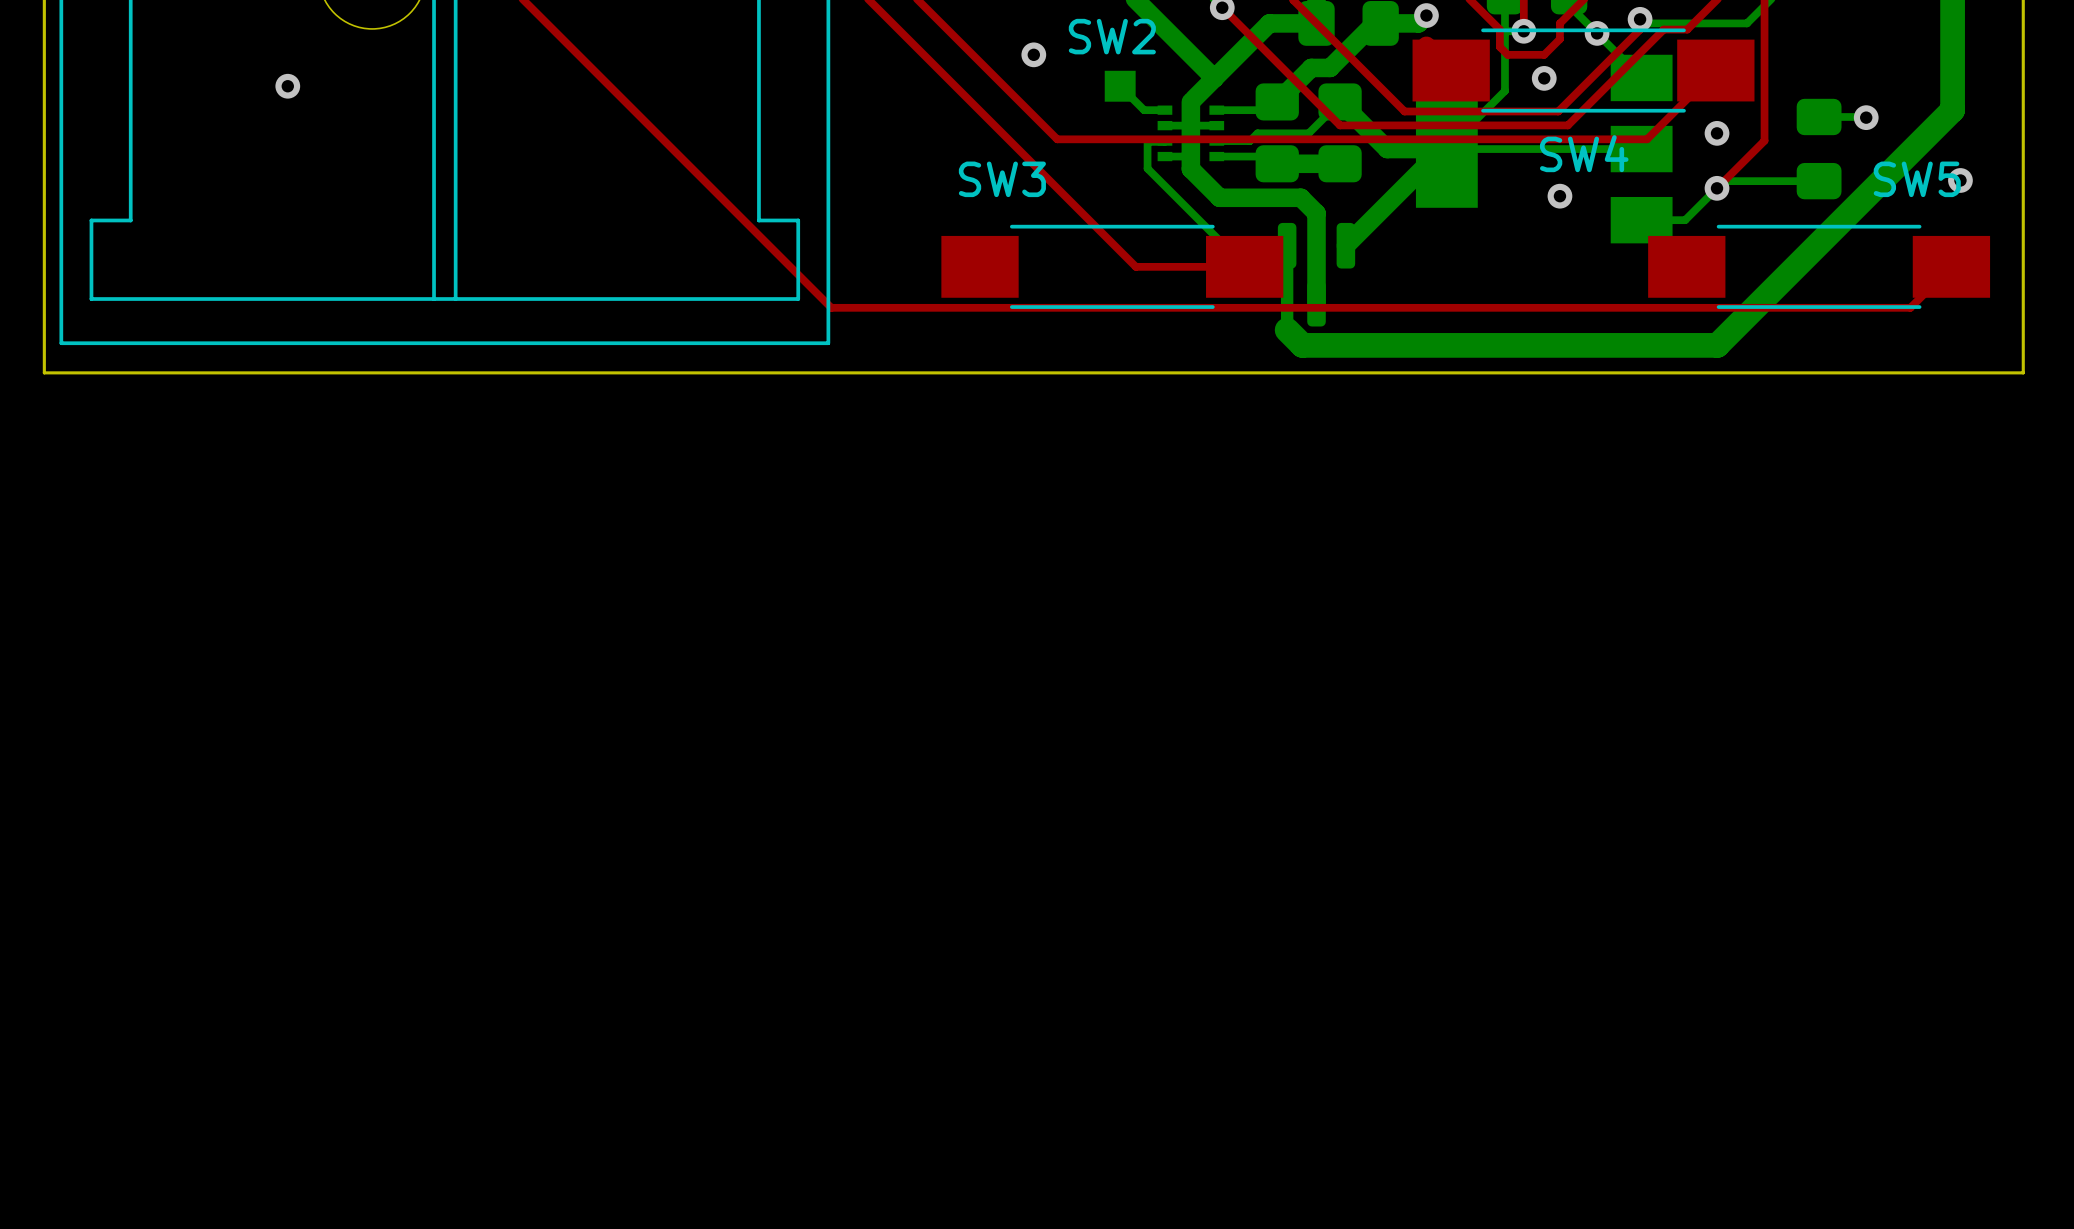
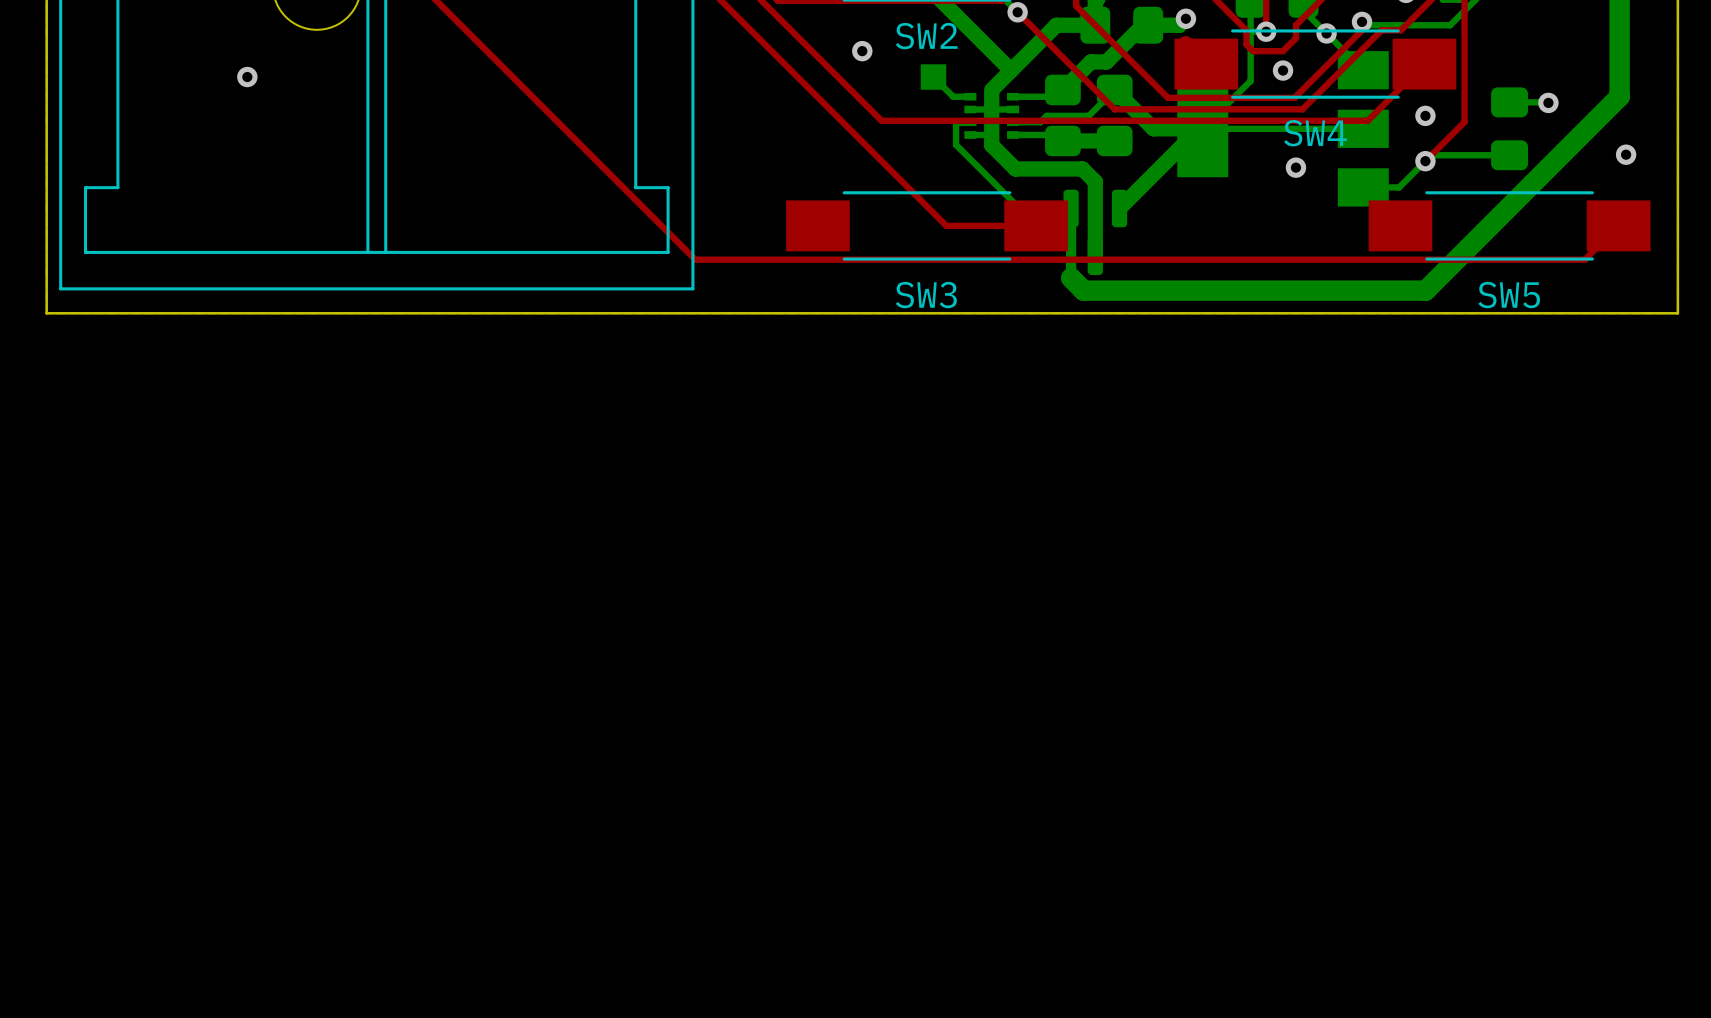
SW3 name position: SW3 (1002, 179) -> SW3 (926, 295)
SW5 name position: SW5 (1917, 179) -> SW5 (1509, 295)

